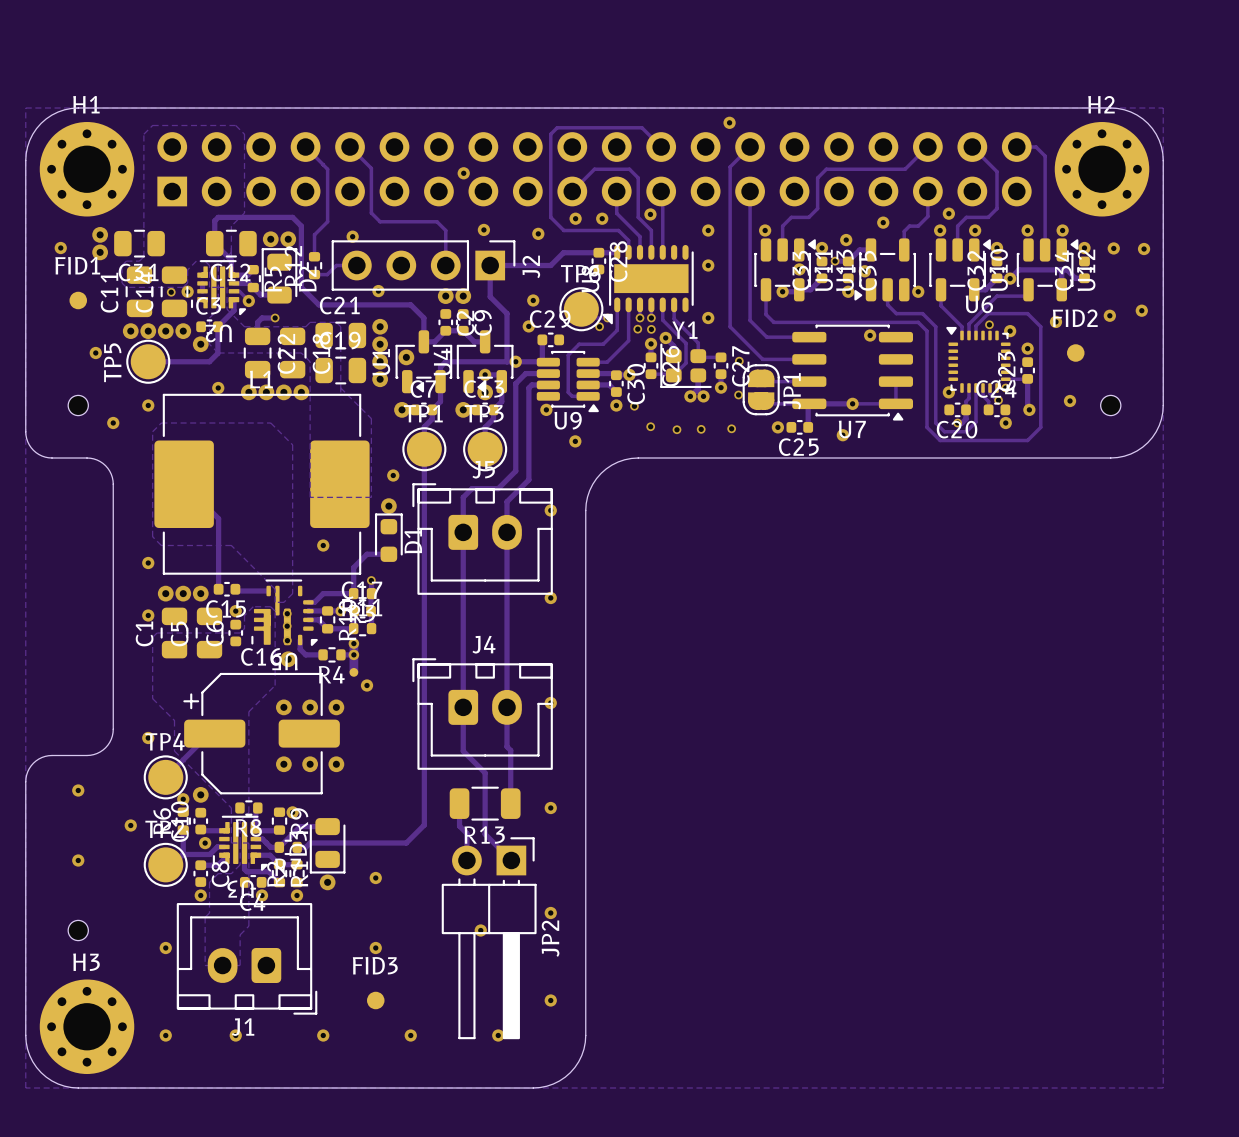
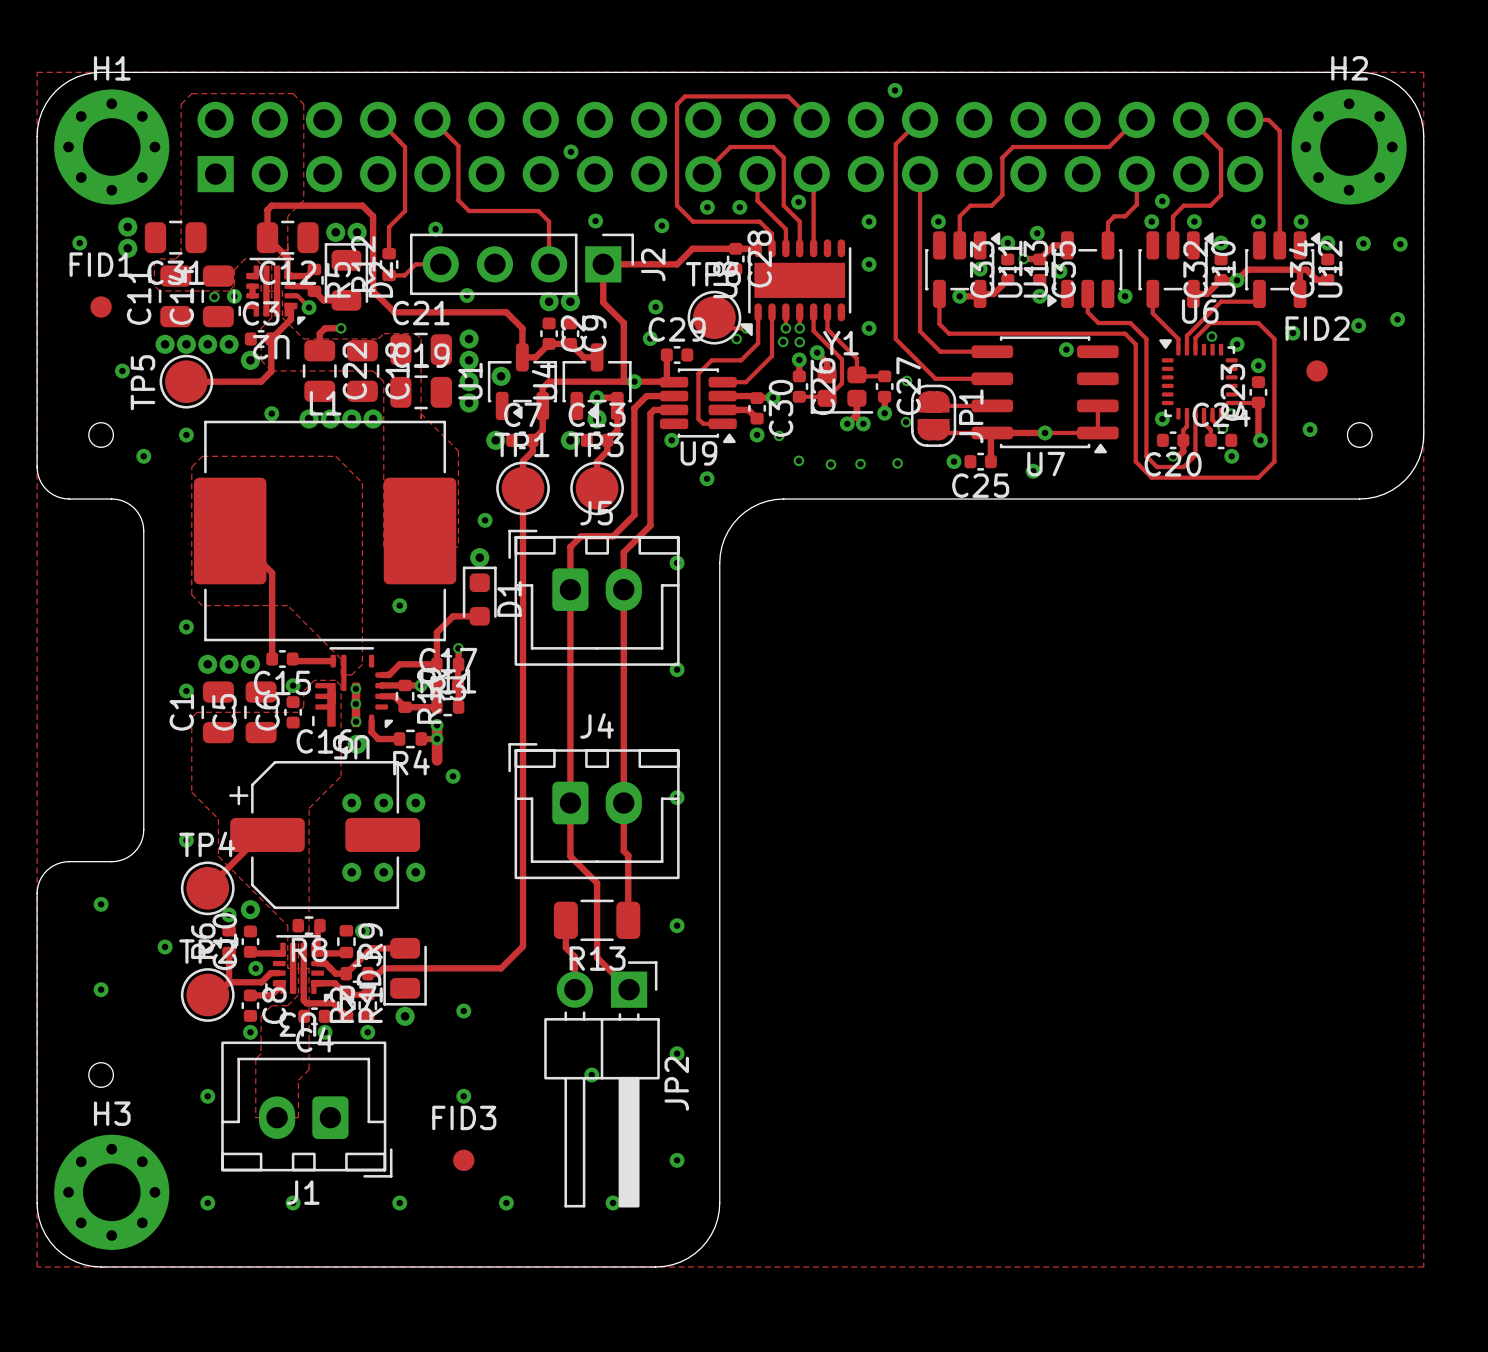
via: (883, 222) -> none

